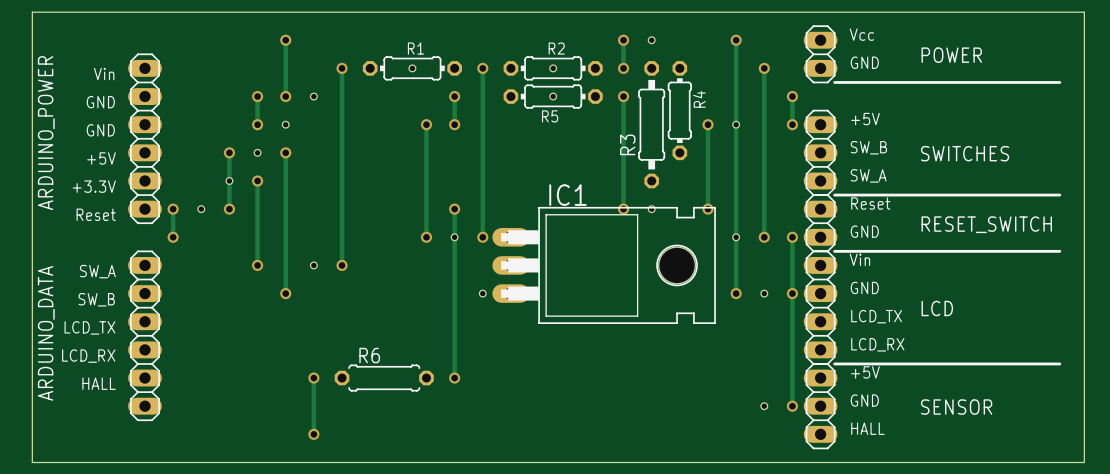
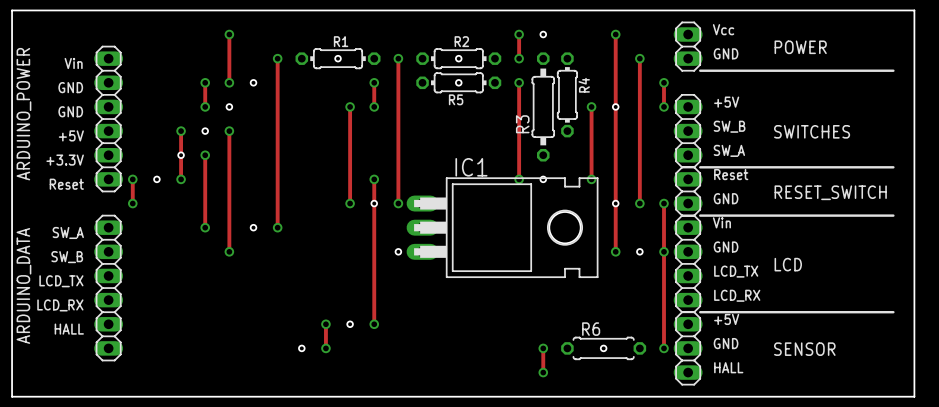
track: (313, 378) (313, 434) -> none
via: (313, 378) -> none
R6 position: (384, 378) -> (603, 348)
track: none -> (325, 324) (325, 348)
via: none -> (325, 324)
hole: none -> (350, 324)
hole: none -> (301, 348)
via: none -> (325, 348)
track: none -> (543, 348) (543, 372)
via: none -> (543, 348)
hole position: (764, 406) -> (603, 348)
via: (313, 434) -> none
via: none -> (543, 372)

